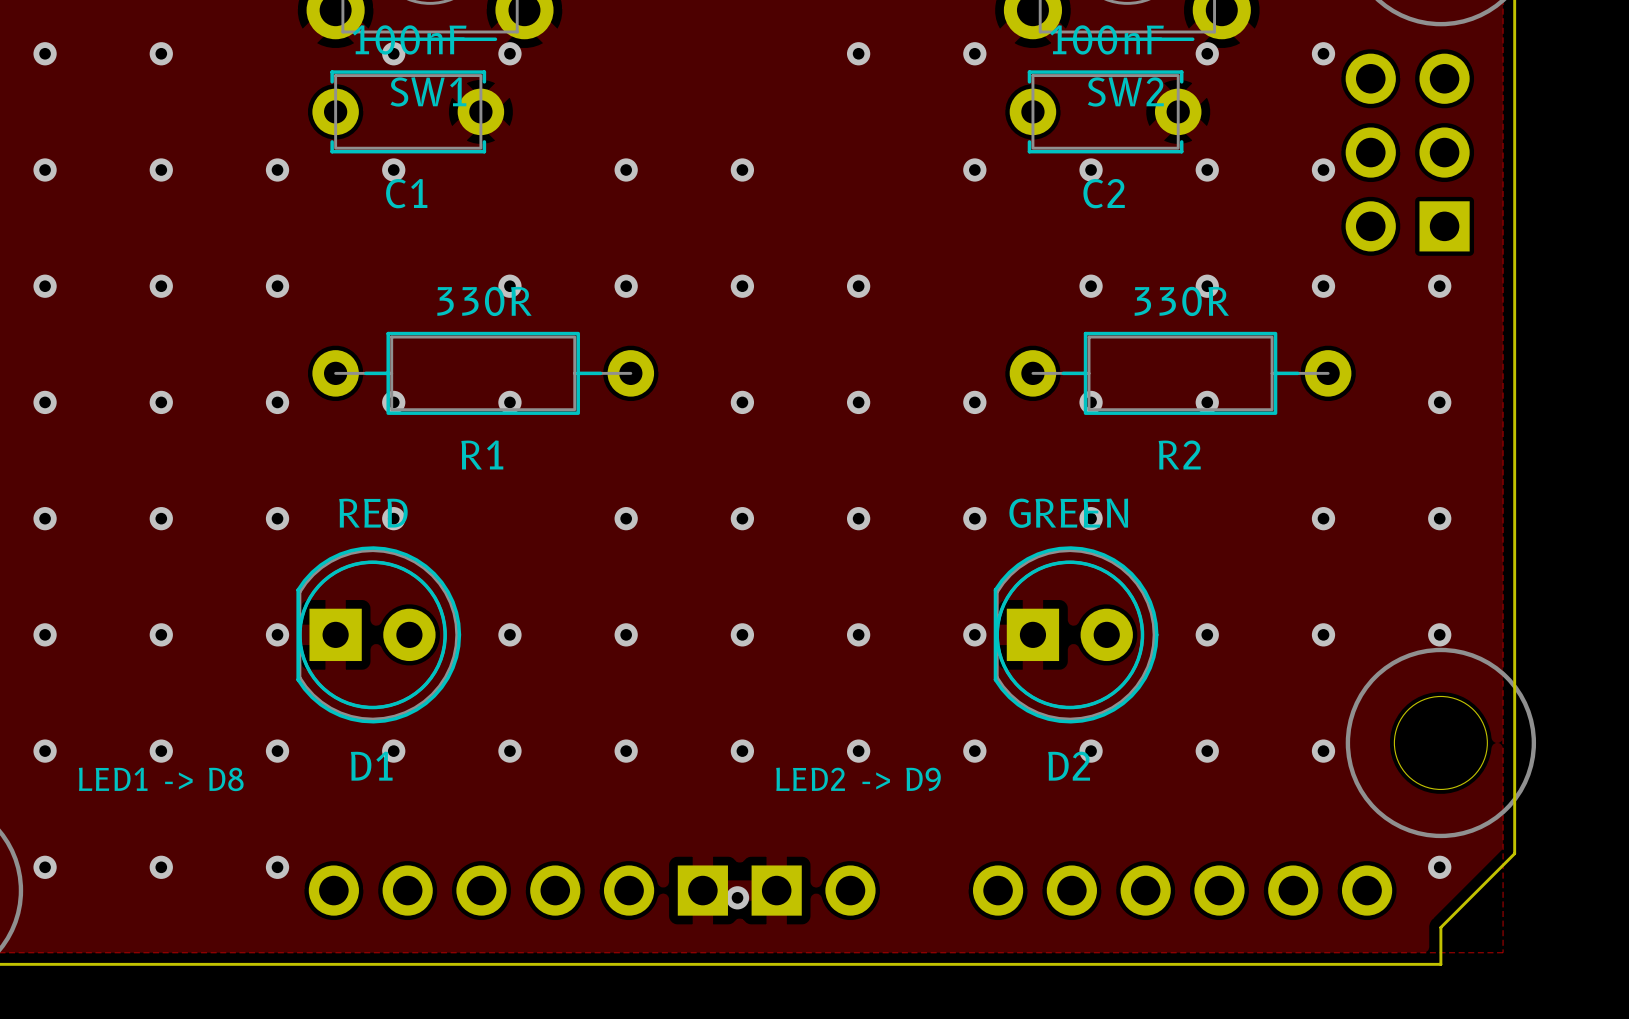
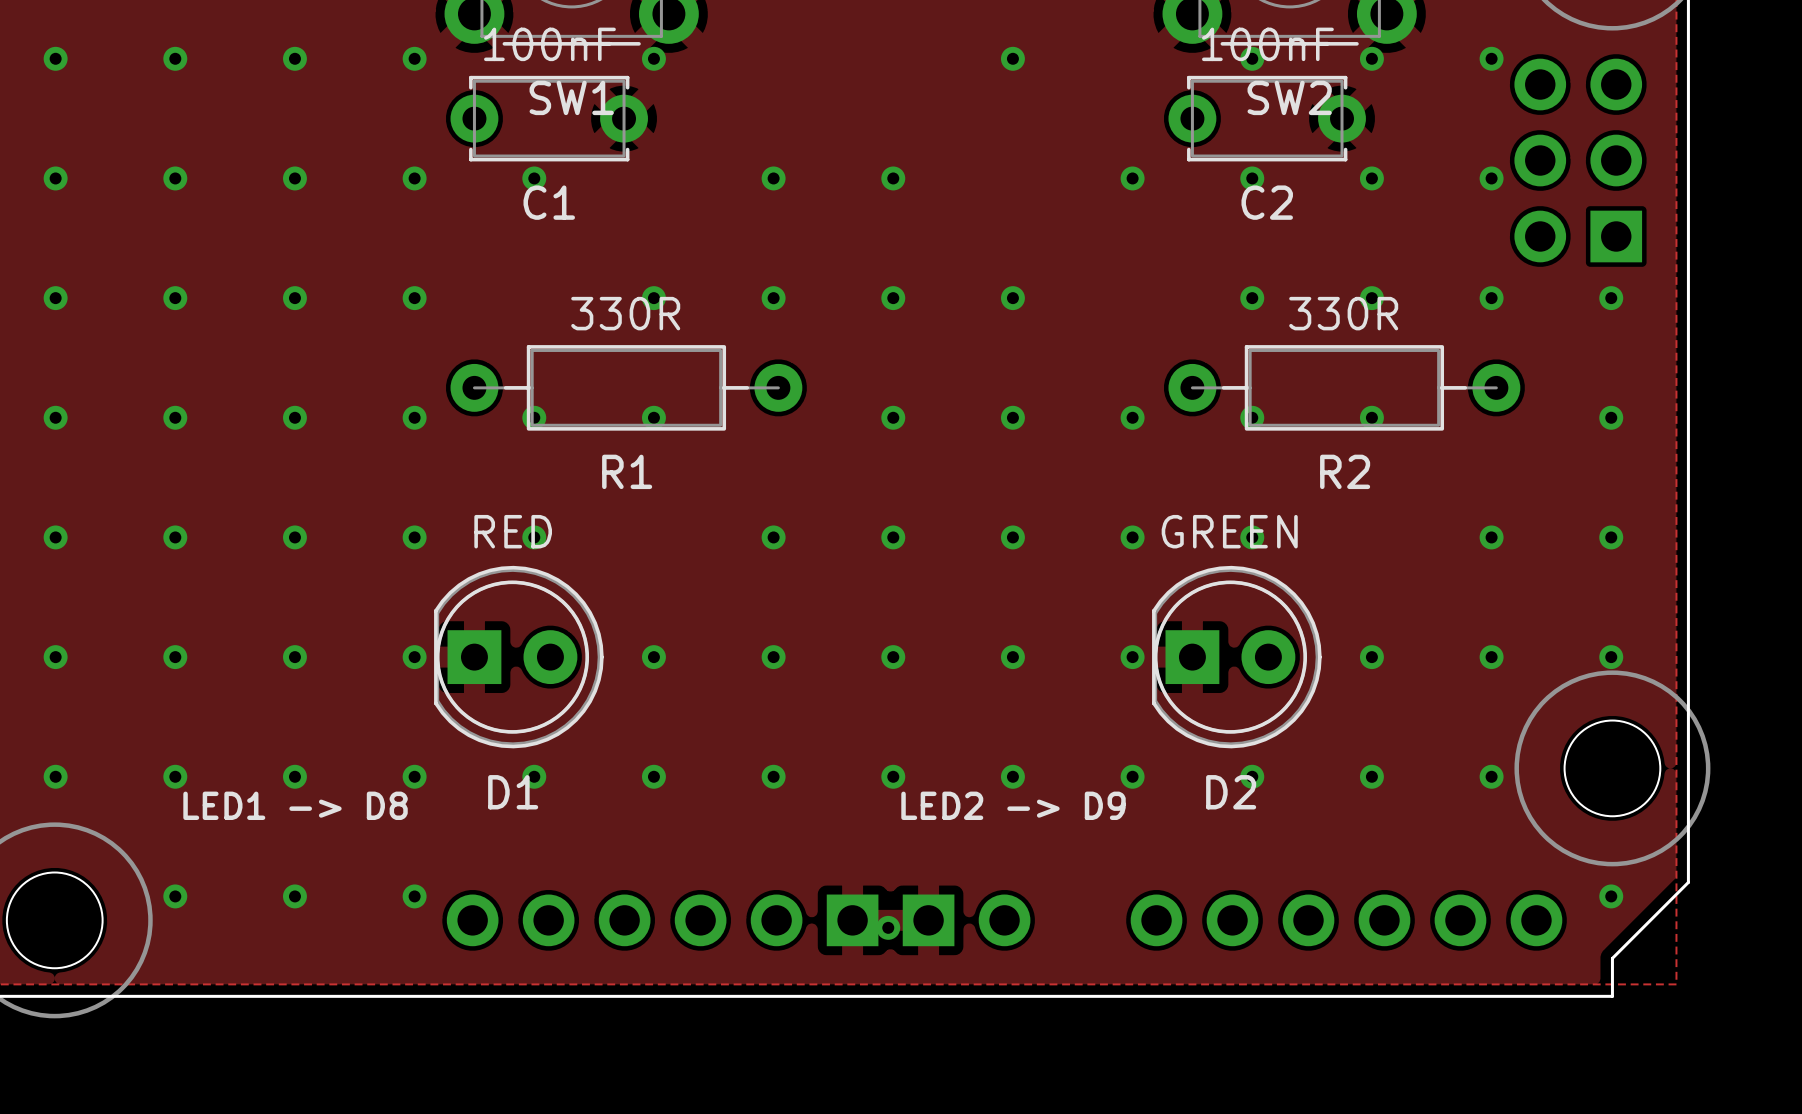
via position: (393, 53) -> (414, 58)
via position: (974, 53) -> (1252, 58)

